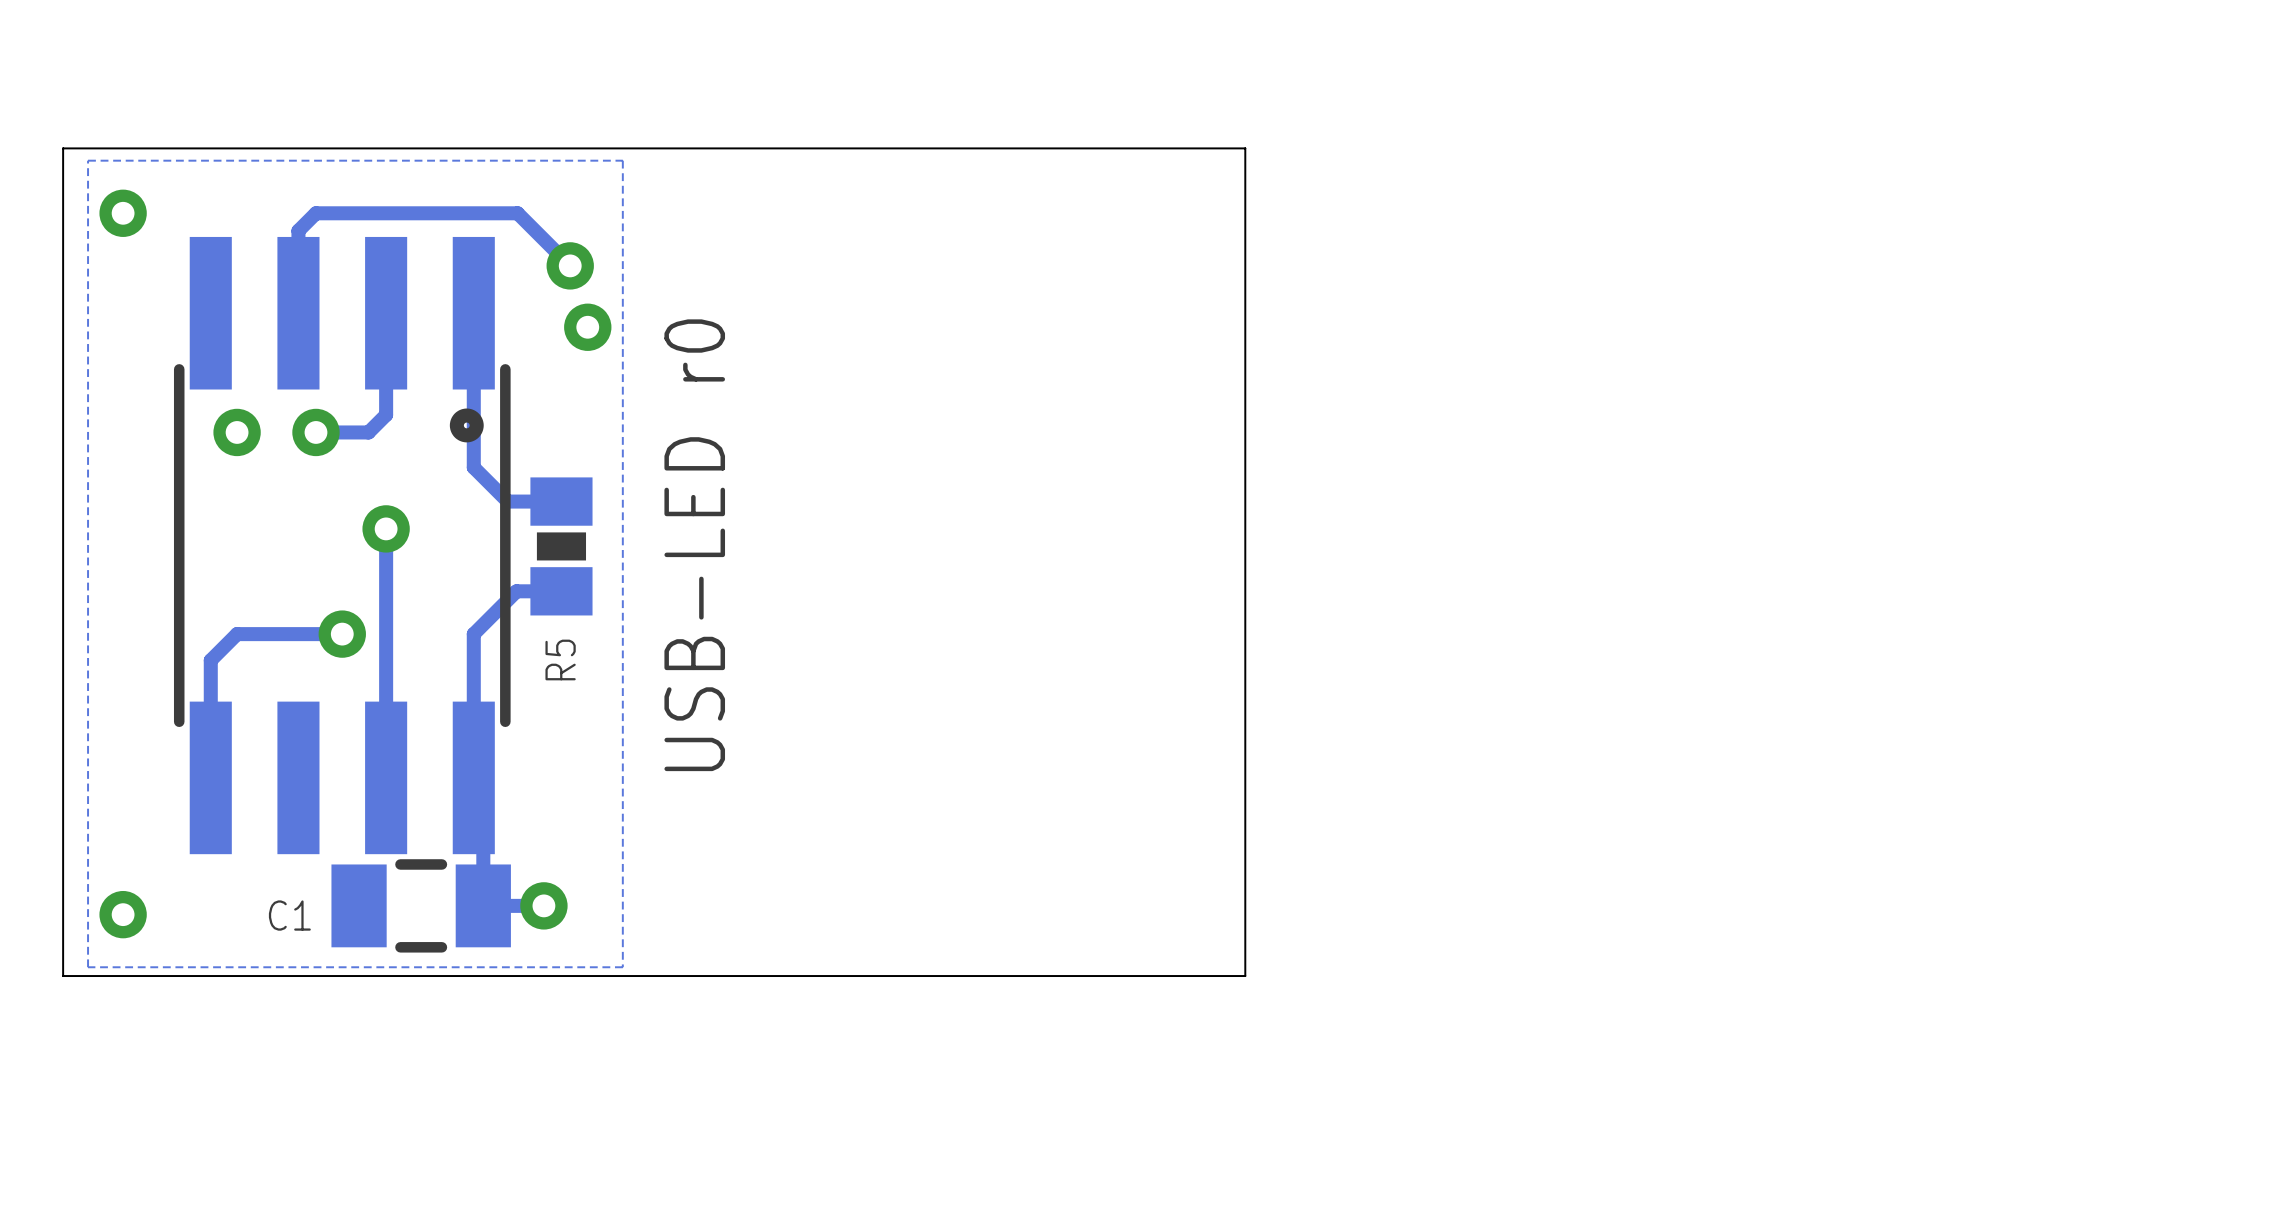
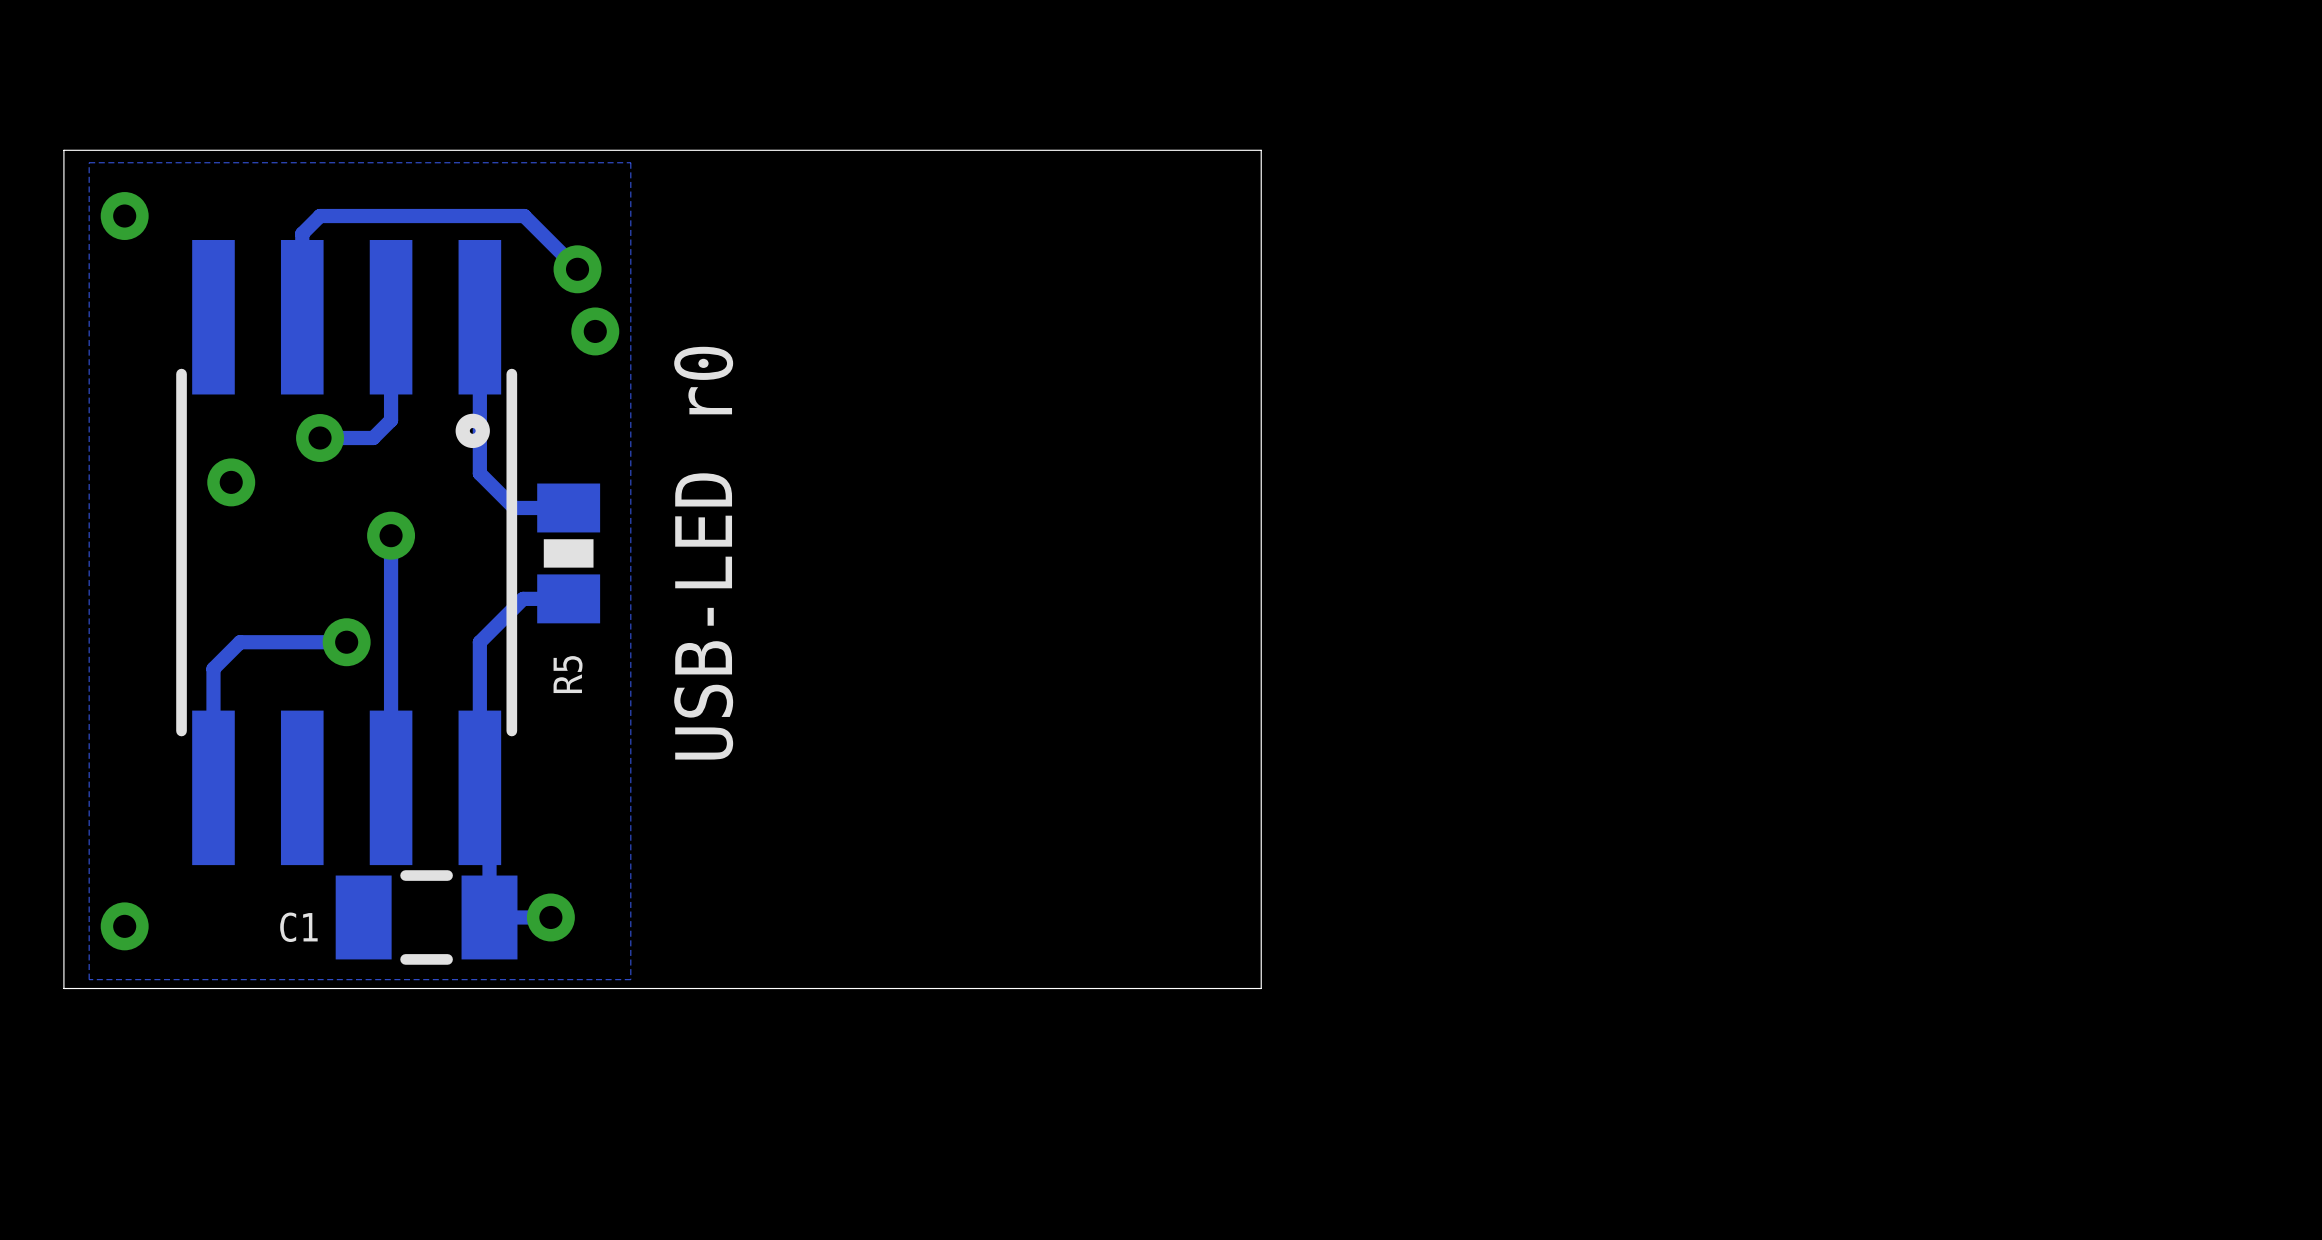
via position: (237, 432) -> (231, 482)

